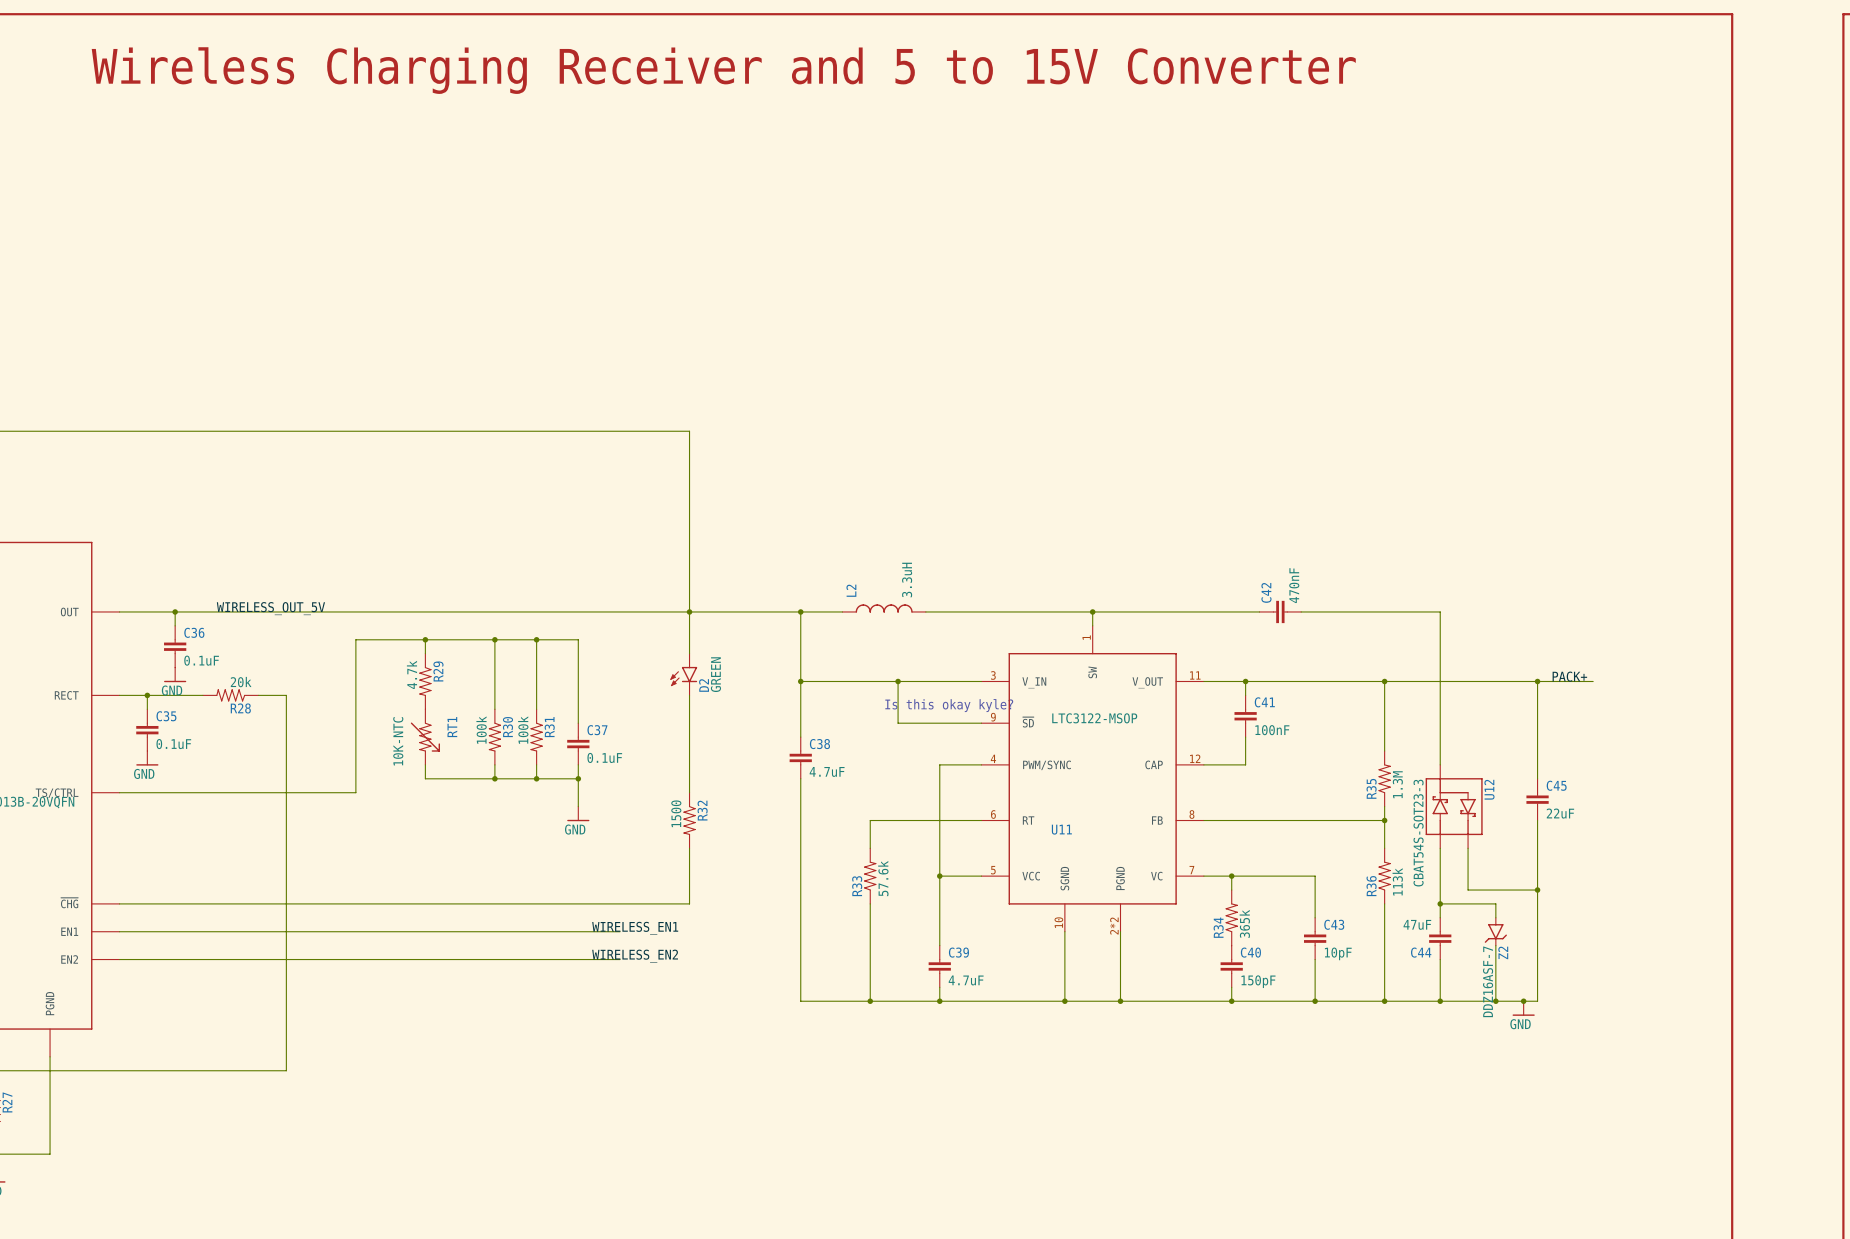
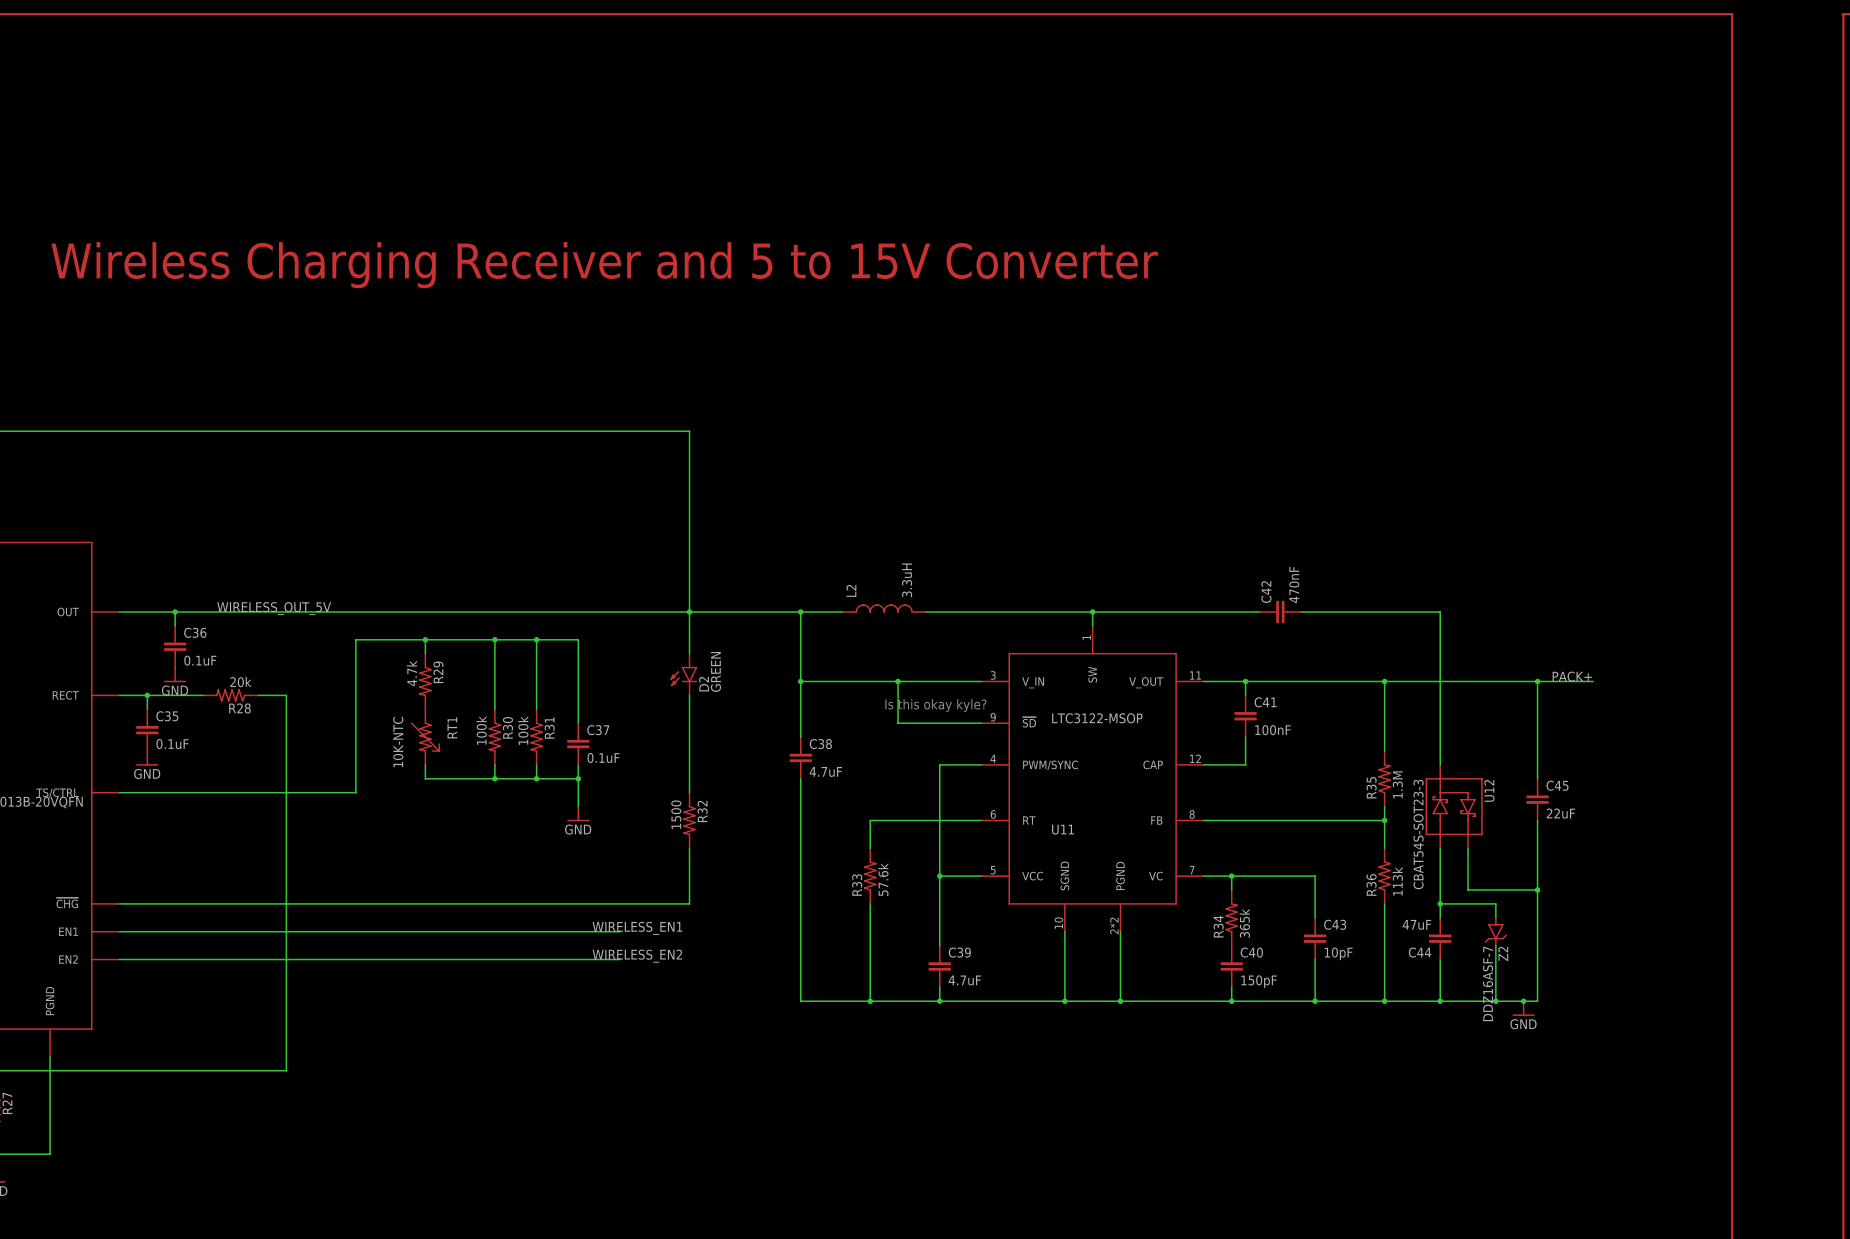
text: Wireless Charging Receiver and 5 to 15V Converter (723, 70) -> none
text: none -> Wireless Charging Receiver and 5 to 15V Converter (604, 265)

